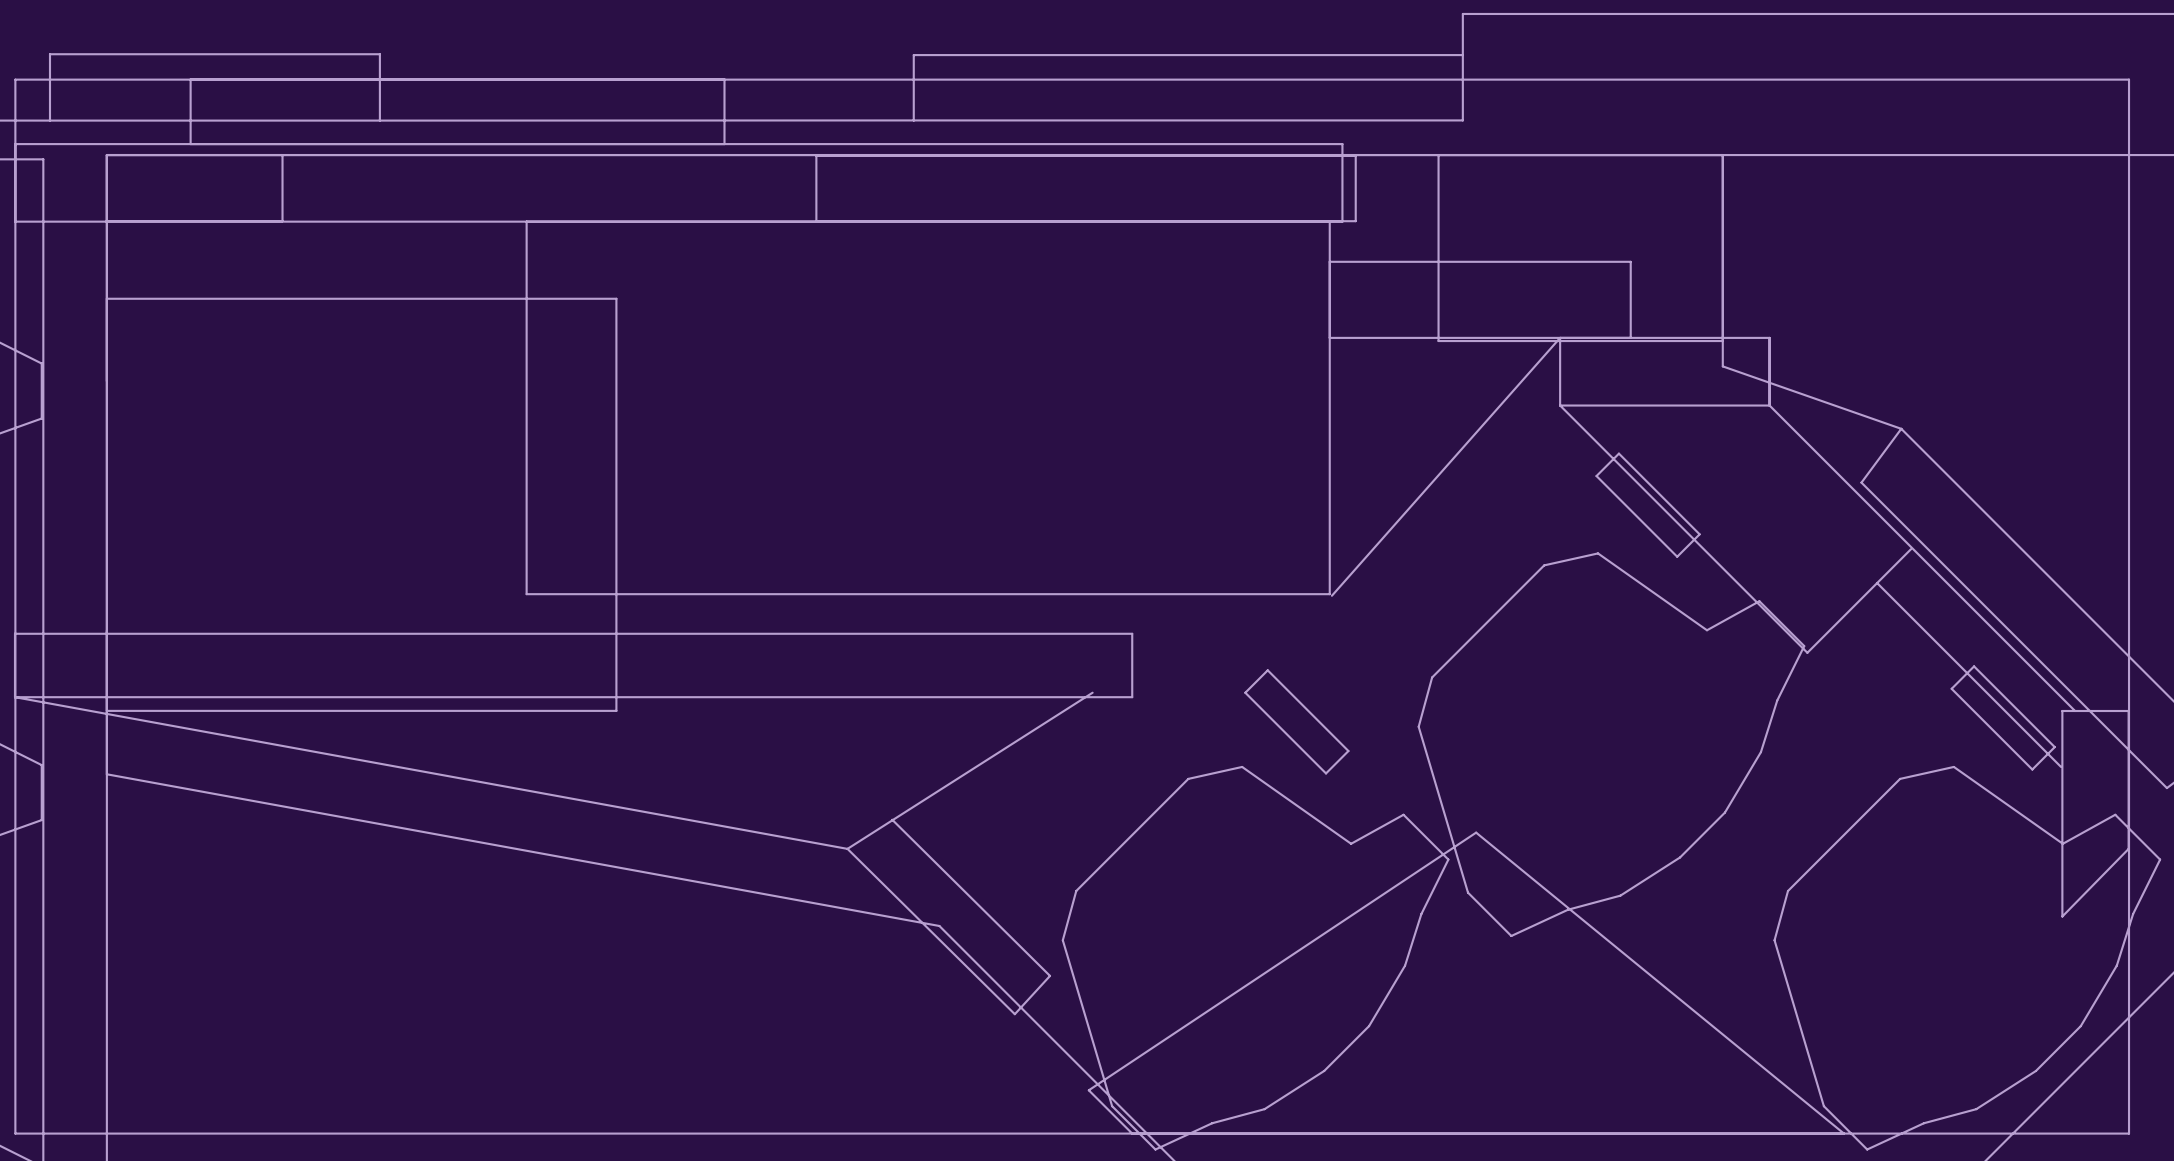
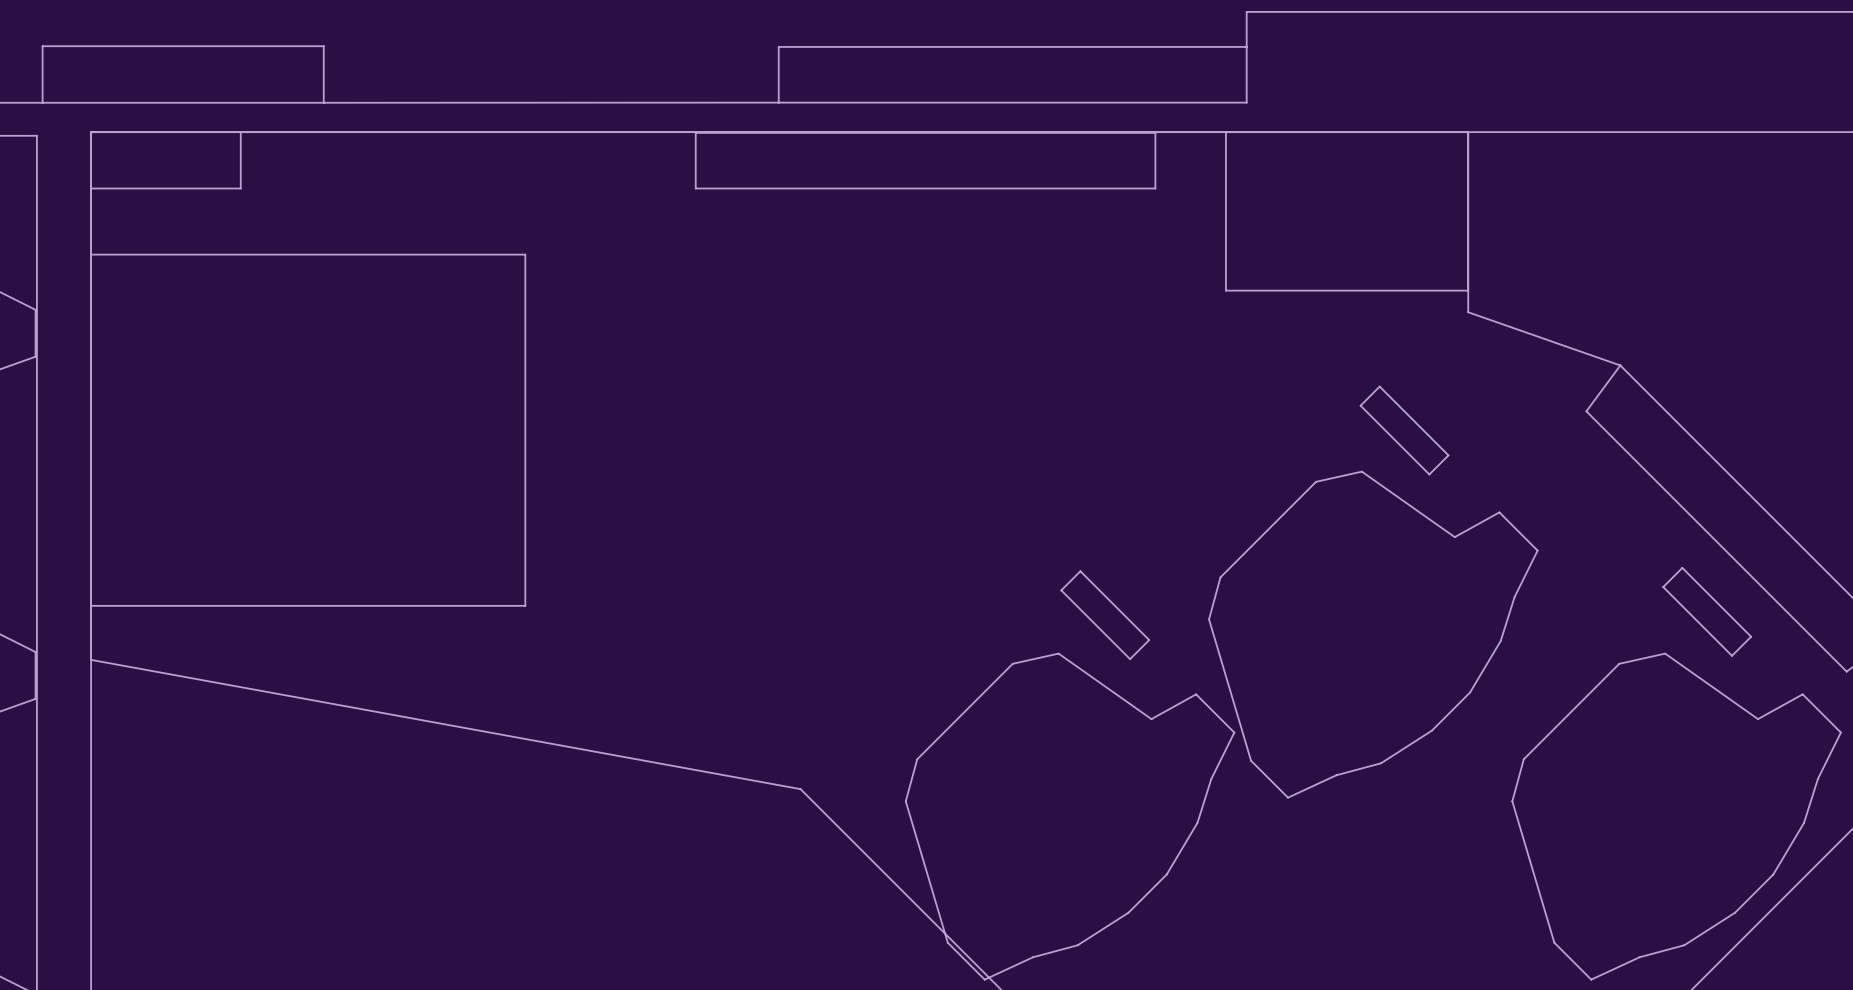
line: (15, 79) (2129, 79) (2129, 1133) (15, 1133) (15, 79) -> none
line: (15, 144) (1342, 144) (1342, 221) (15, 221) -> none
line: (190, 144) (190, 79) (724, 79) (724, 144) -> none
line: (526, 221) (526, 594) (1329, 594) (1329, 221) -> none
line: (1329, 261) (1630, 261) (1630, 337) -> none
line: (1329, 337) (1769, 337) (1769, 405) -> none
line: (1560, 405) (1807, 652) (1910, 549) -> none
line: (1560, 405) (1769, 405) -> none
line: (1560, 405) (1560, 337) (1331, 595) -> none
line: (1769, 405) (2075, 710) -> none
line: (1877, 583) (2061, 766) -> none
line: (1092, 692) (847, 848) -> none
line: (14, 697) (847, 848) -> none
line: (14, 697) (1132, 697) (1132, 633) (14, 633) (14, 697) -> none
line: (2062, 710) (2128, 710) (2128, 848) (2062, 916) (2062, 710) -> none
line: (892, 819) (1050, 975) (1014, 1014) (847, 848) -> none
line: (1132, 1133) (1088, 1090) (1476, 832) (1843, 1133) -> none

